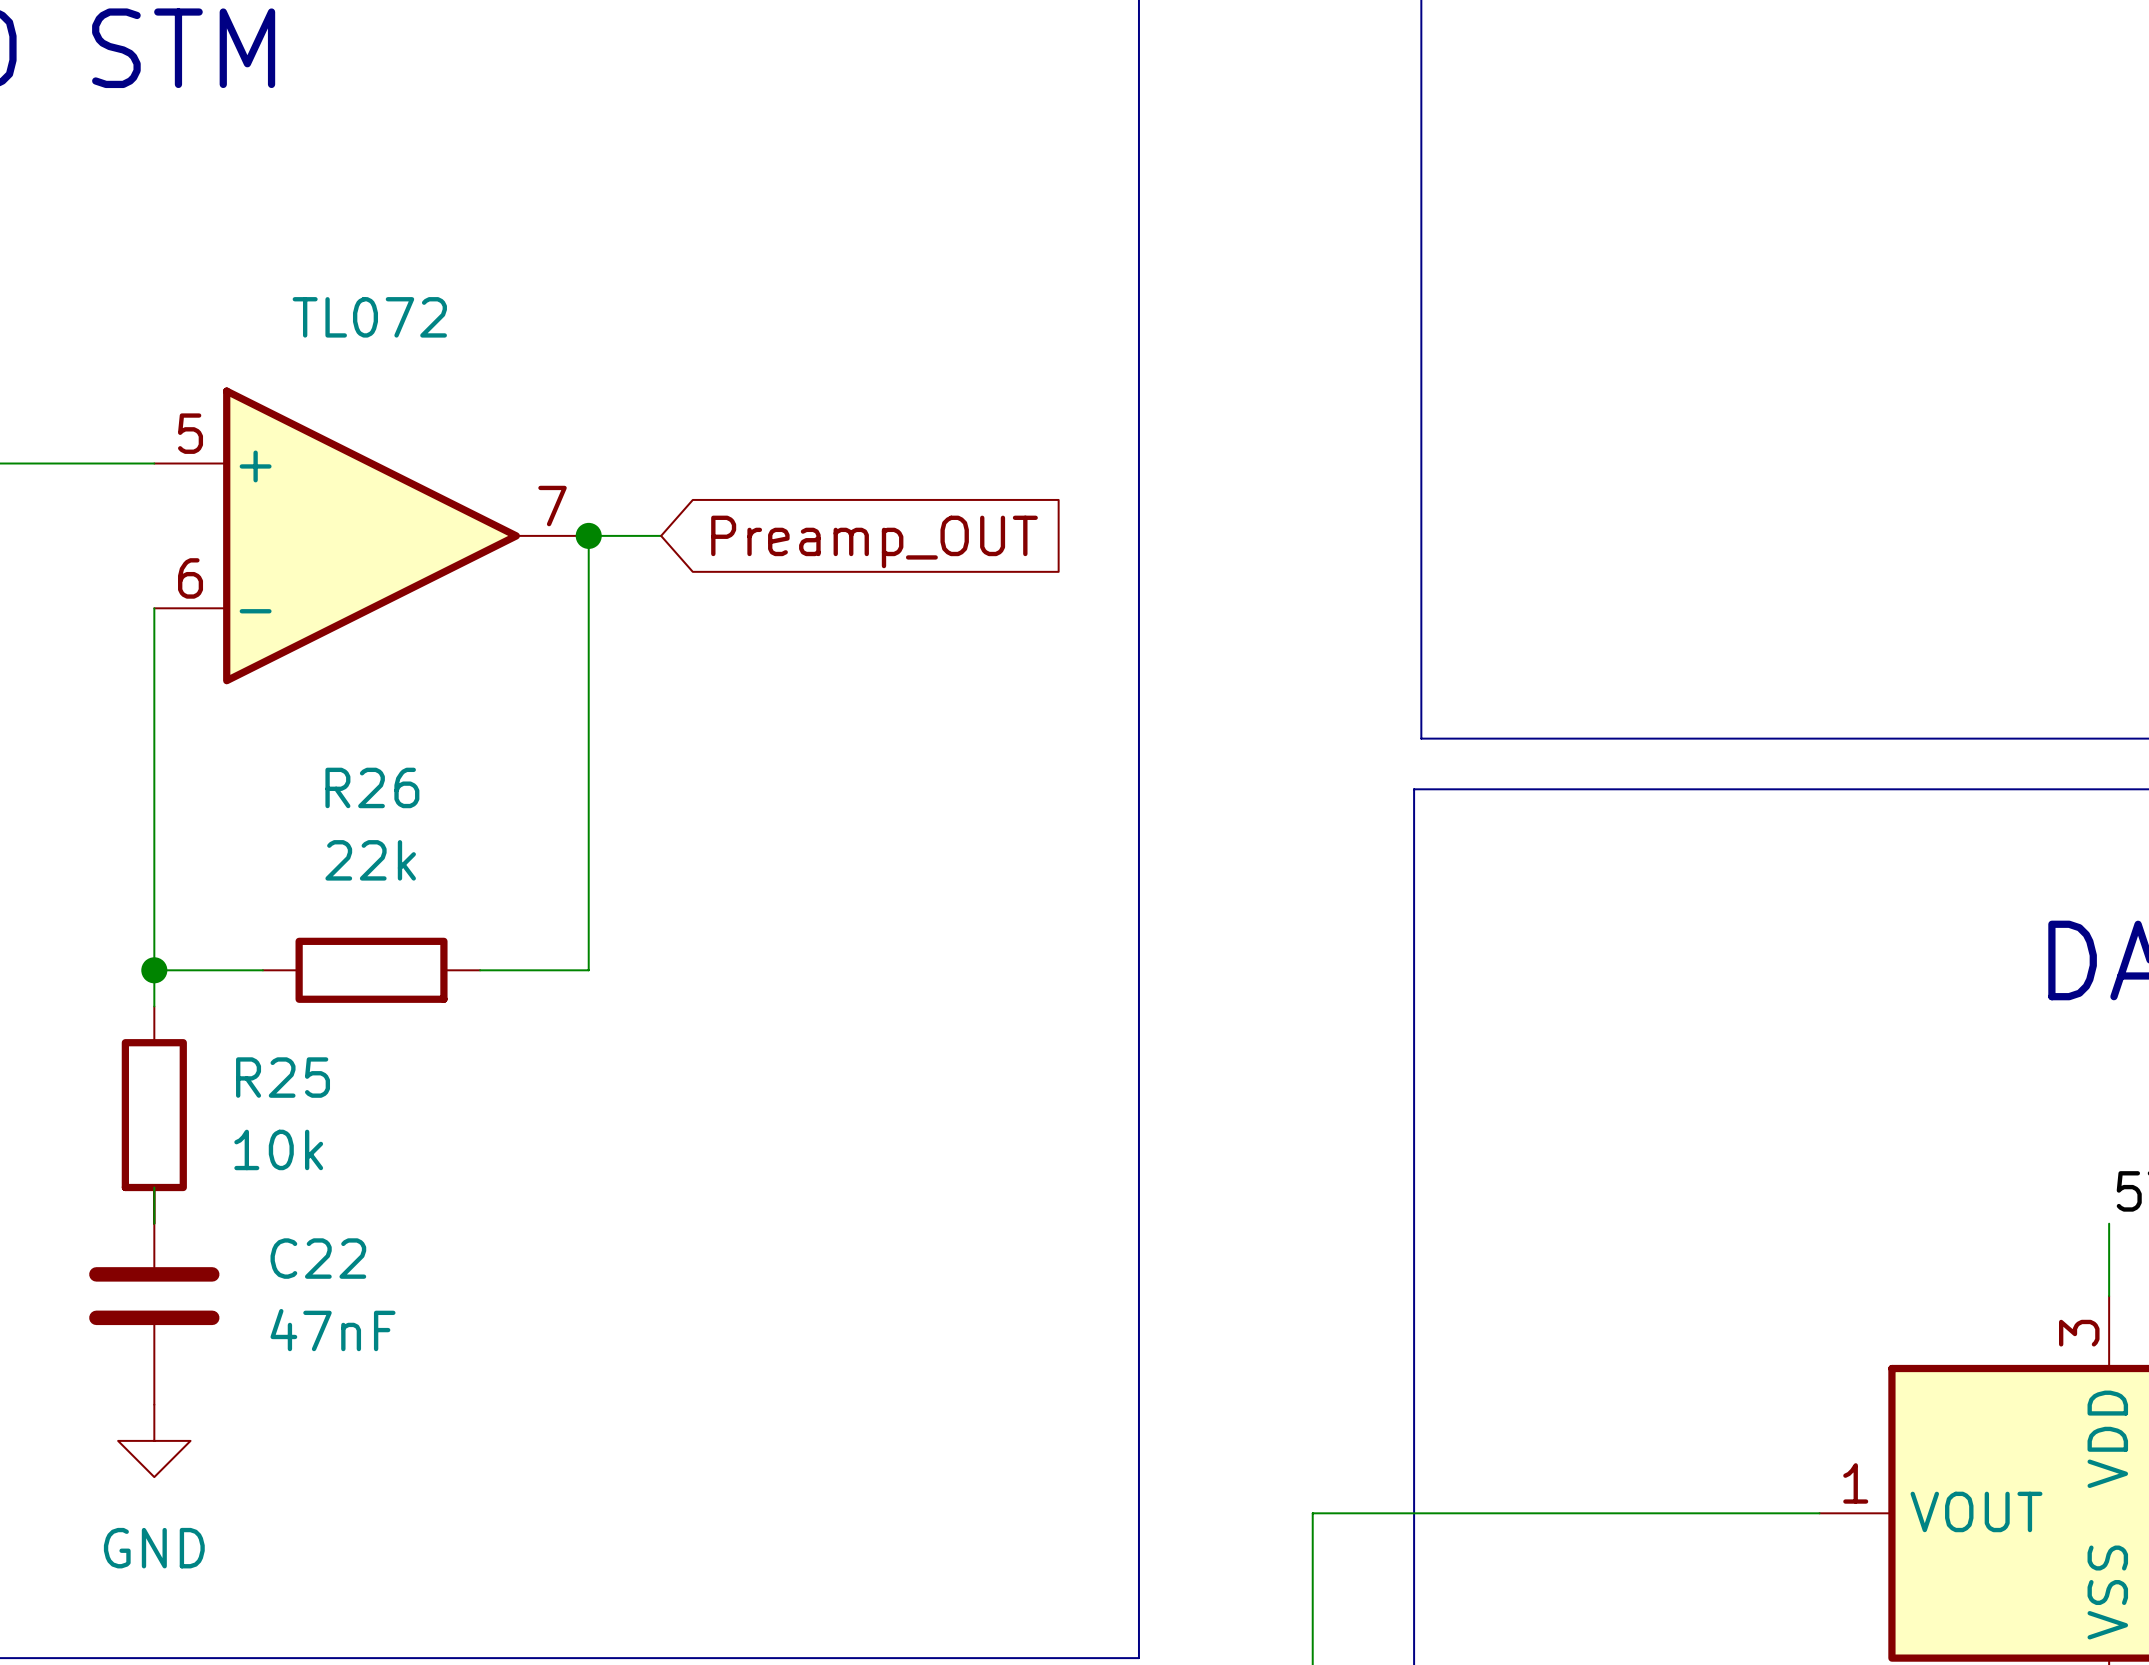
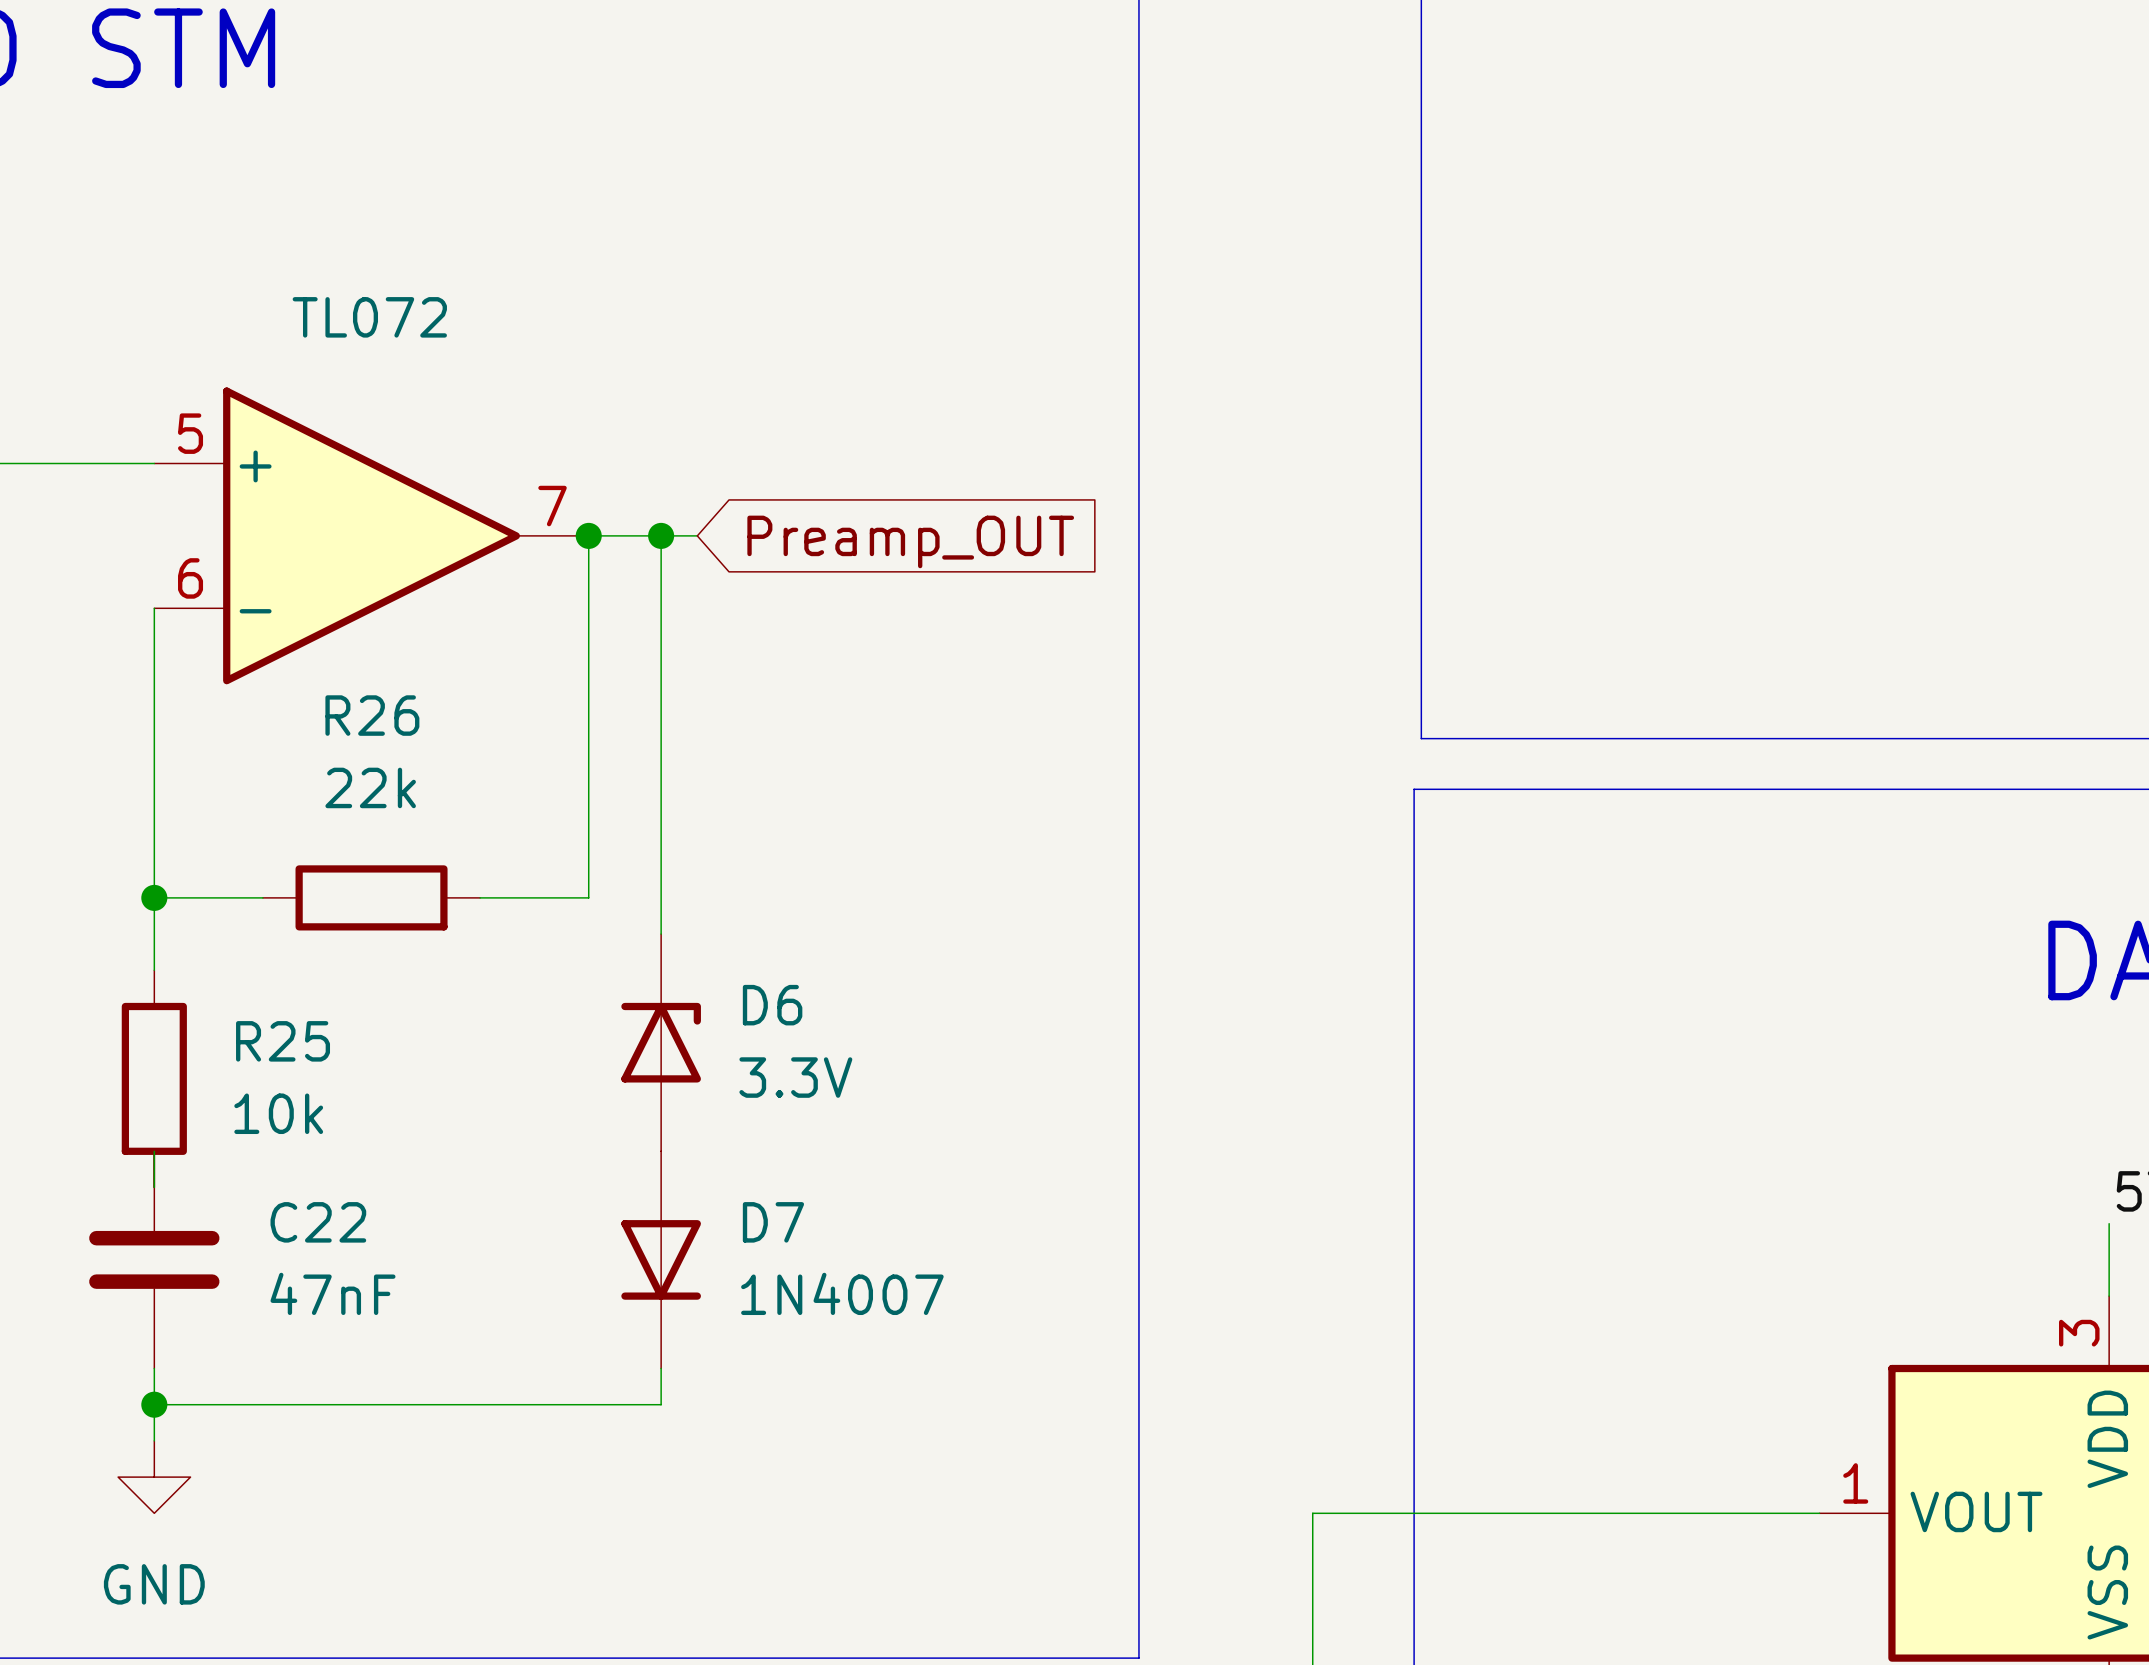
junction: none -> (661, 535)
wire: none -> (697, 535) (661, 535) (661, 934)
global label position: Preamp_OUT (874, 541) -> Preamp_OUT (910, 541)
wire: none -> (154, 897) (262, 897)
wire: (588, 897) (588, 970) (480, 970) -> (588, 897) (480, 897)
junction position: (154, 970) -> (154, 897)
wire: (262, 970) (154, 970) (154, 1006) -> none
R26 position: (371, 970) -> (371, 897)
D6: none -> 3.3V (661, 1042)
R25 position: (154, 1115) -> (154, 1078)
D7: none -> 1N4007 (661, 1259)
C22 position: (154, 1296) -> (154, 1259)
wire: none -> (661, 1368) (661, 1404) (154, 1404)
junction: none -> (154, 1404)
power symbol position: GND (154, 1440) -> GND (154, 1477)

